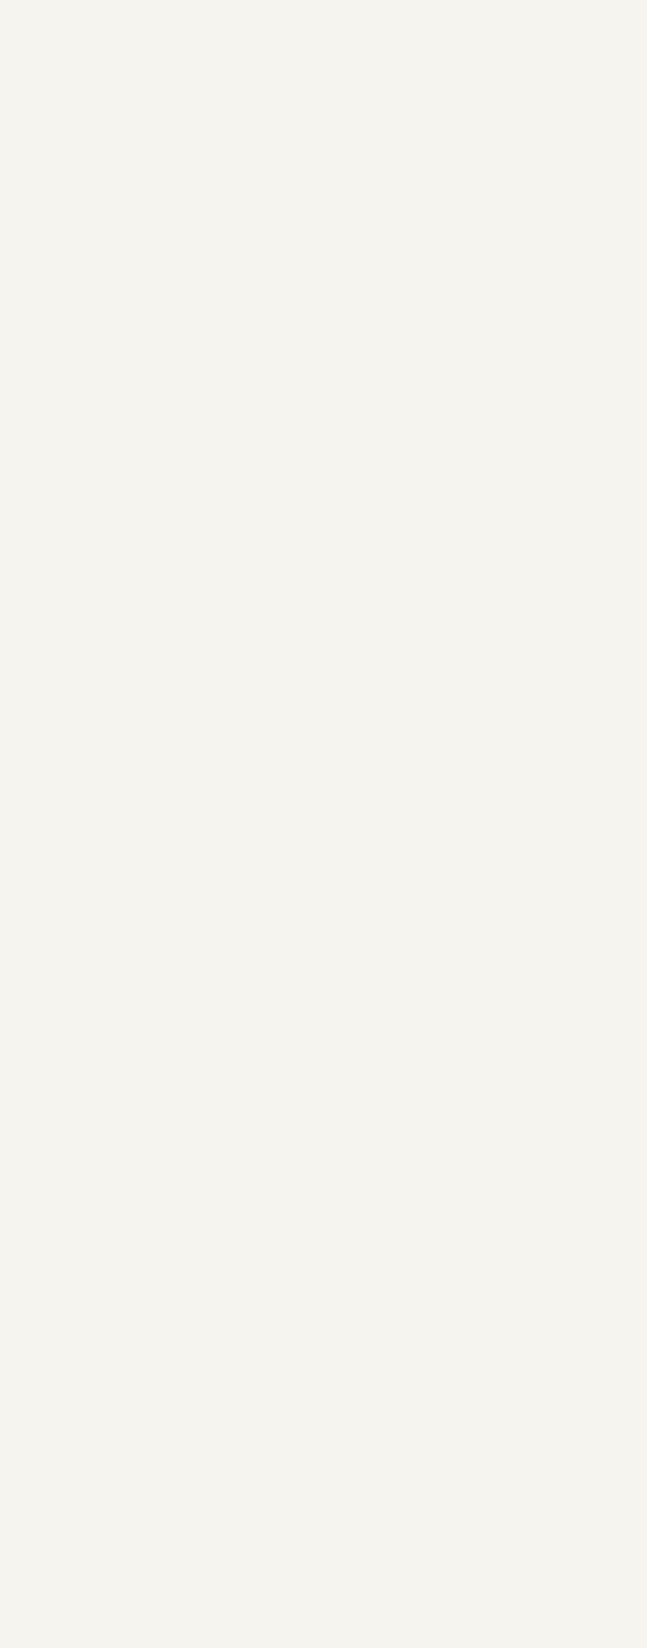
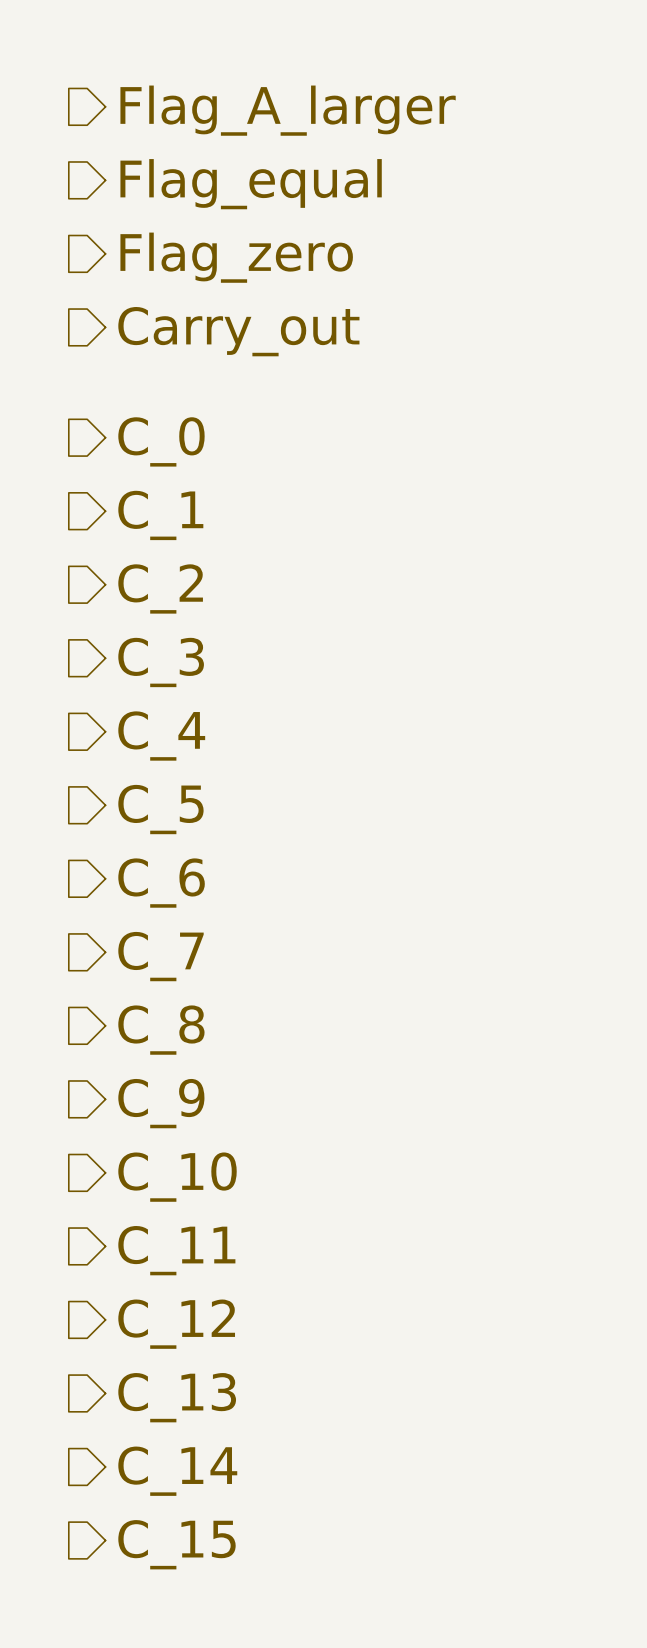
hierarchical label: none -> Flag_A_larger (288, 110)
hierarchical label: none -> Flag_equal (251, 184)
hierarchical label: none -> Flag_zero (236, 257)
hierarchical label: none -> Carry_out (238, 331)
hierarchical label: none -> C_0 (161, 441)
hierarchical label: none -> C_1 (160, 515)
hierarchical label: none -> C_2 (160, 588)
hierarchical label: none -> C_3 (161, 662)
hierarchical label: none -> C_4 (161, 736)
hierarchical label: none -> C_5 (160, 809)
hierarchical label: none -> C_6 (161, 883)
hierarchical label: none -> C_7 (160, 956)
hierarchical label: none -> C_8 (161, 1030)
hierarchical label: none -> C_9 (161, 1103)
hierarchical label: none -> C_10 (177, 1177)
hierarchical label: none -> C_11 (176, 1250)
hierarchical label: none -> C_12 (176, 1324)
hierarchical label: none -> C_13 (177, 1397)
hierarchical label: none -> C_14 (177, 1471)
hierarchical label: none -> C_15 (176, 1544)

